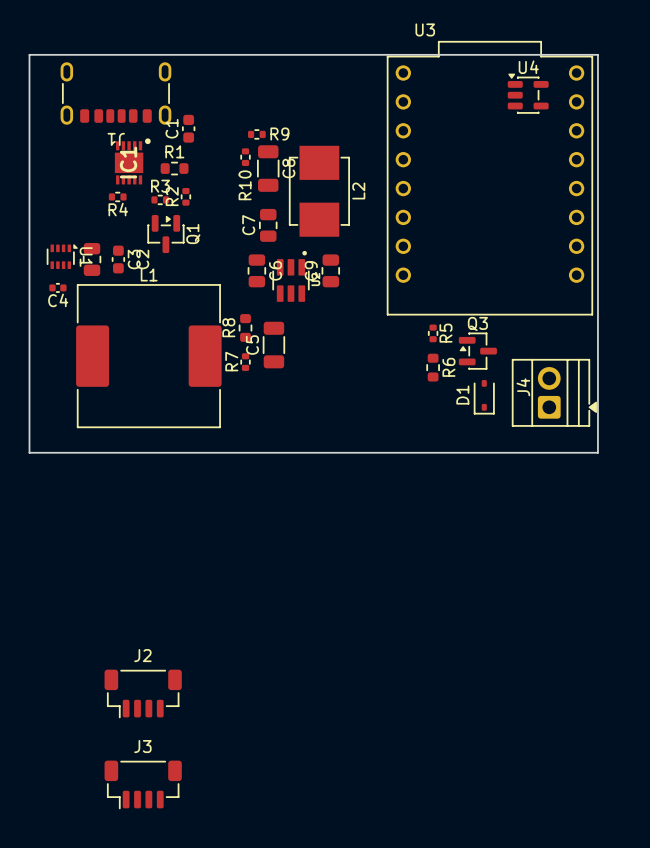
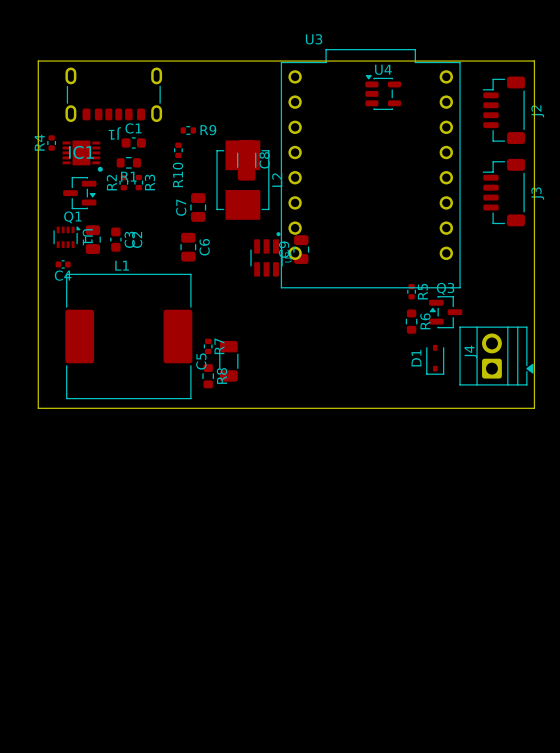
U4 position: (528, 93) -> (383, 92)
C1 rotation: 0° (188, 128) -> 90° clockwise (133, 142)
C1 position: (188, 128) -> (133, 142)
R9 position: (256, 134) -> (188, 130)
R1 name position: R1 (174, 151) -> R1 (128, 176)
R10 position: (245, 157) -> (178, 150)
IC1 rotation: 0° (132, 161) -> 90° clockwise (82, 156)
IC1 position: (132, 161) -> (82, 156)
R1 position: (174, 168) -> (128, 162)
U3 position: (489, 178) -> (370, 168)
L2 position: (319, 191) -> (242, 180)
R4 rotation: 0° (117, 196) -> 90° clockwise (51, 142)
R4 position: (117, 196) -> (51, 142)
R2 position: (185, 196) -> (123, 182)
R3 rotation: 0° (160, 199) -> 90° clockwise (138, 182)
R3 position: (160, 199) -> (138, 182)
C7 position: (268, 225) -> (198, 207)
Q1 rotation: 0° (165, 234) -> 90° clockwise (79, 193)
Q1 position: (165, 234) -> (79, 193)
C6 position: (256, 270) -> (188, 247)
L1 name position: L1 (149, 274) -> L1 (122, 265)
R8 name position: R8 (228, 327) -> R8 (222, 375)
R8 position: (245, 327) -> (208, 376)
R5 position: (433, 333) -> (411, 291)
C5 name position: C5 (252, 345) -> C5 (201, 361)
C5 position: (273, 345) -> (228, 361)
Q3 position: (477, 351) -> (445, 312)
L1 position: (148, 356) -> (128, 336)
R7 name position: R7 (231, 361) -> R7 (219, 346)
R7 position: (245, 362) -> (208, 346)
R6 position: (433, 367) -> (411, 321)
J2 rotation: 0° (143, 693) -> 90° clockwise (503, 110)
J2 position: (143, 693) -> (503, 110)
J3 rotation: 0° (143, 784) -> 90° clockwise (503, 192)
J3 position: (143, 784) -> (503, 192)

